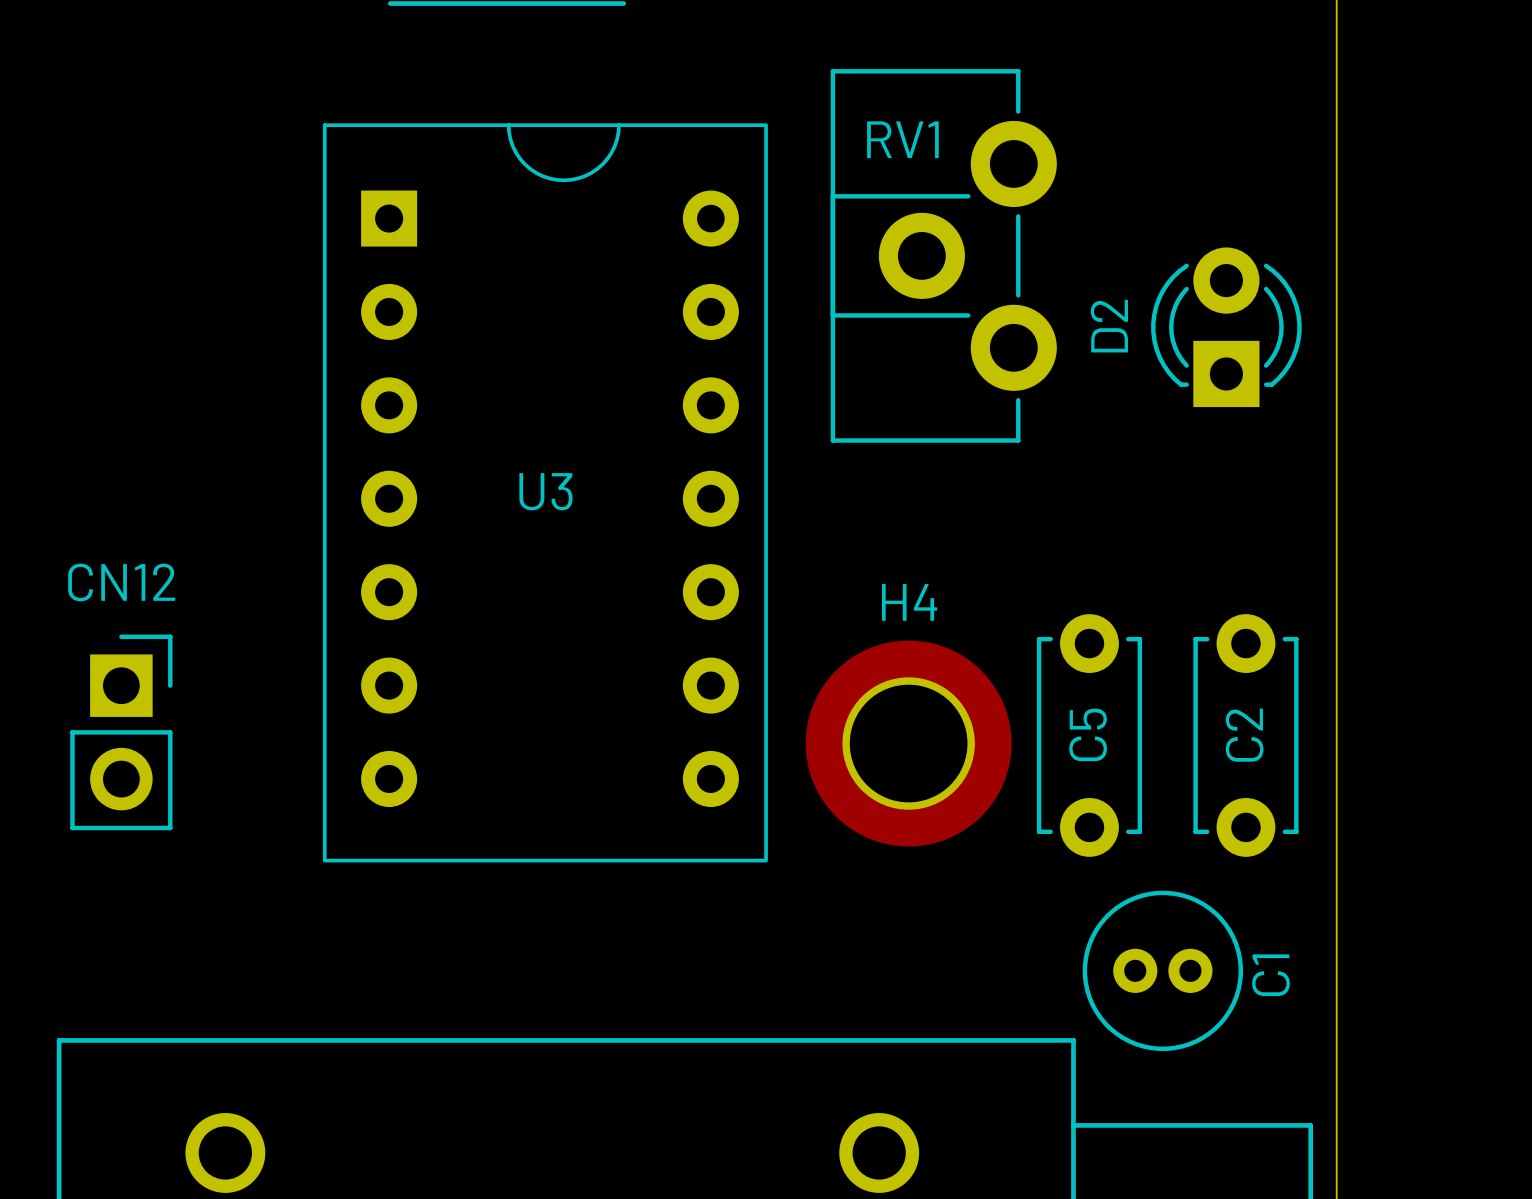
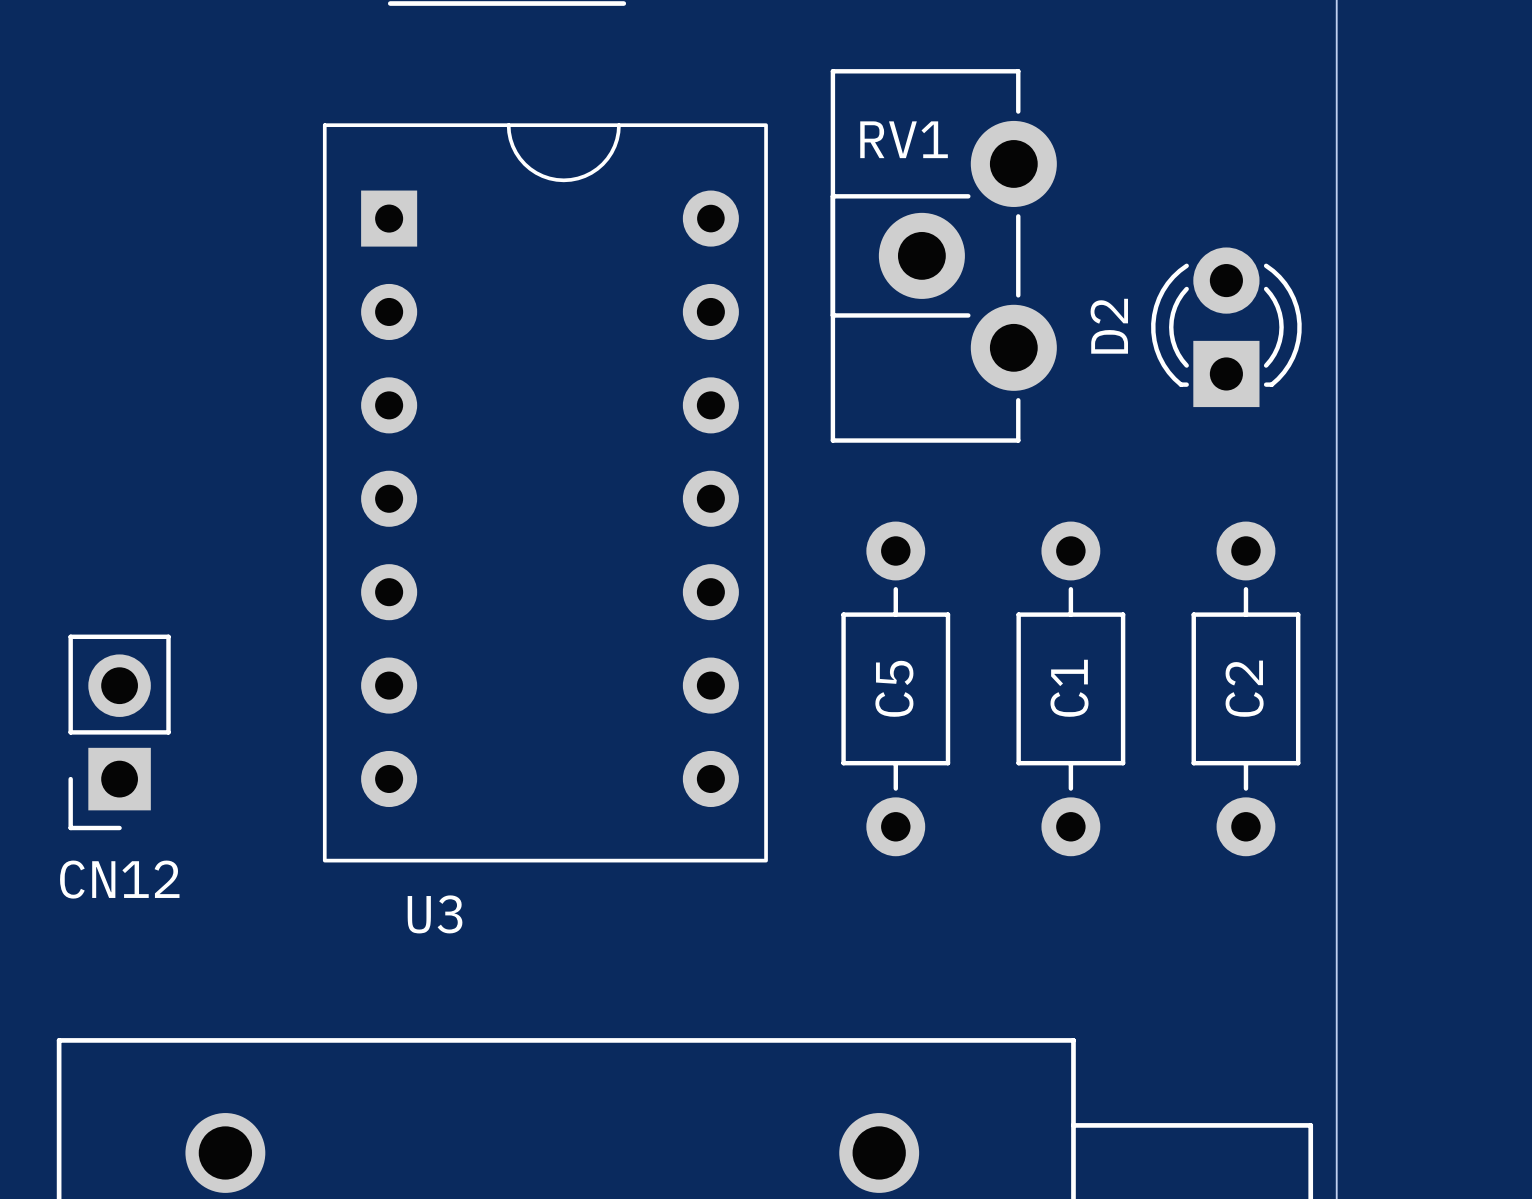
U3 name position: U3 (545, 491) -> U3 (435, 914)
C5 footprint: [1036, 614, 1143, 857] -> [841, 521, 951, 857]
C2 footprint: [1193, 614, 1299, 857] -> [1191, 521, 1301, 857]
CN12 rotation: 0° (121, 732) -> 180° (119, 732)
H4: (908, 743) -> none
C1 footprint: [1082, 890, 1244, 1052] -> [1016, 521, 1126, 857]
C1 name position: C1 (1270, 975) -> C1 (1069, 688)

